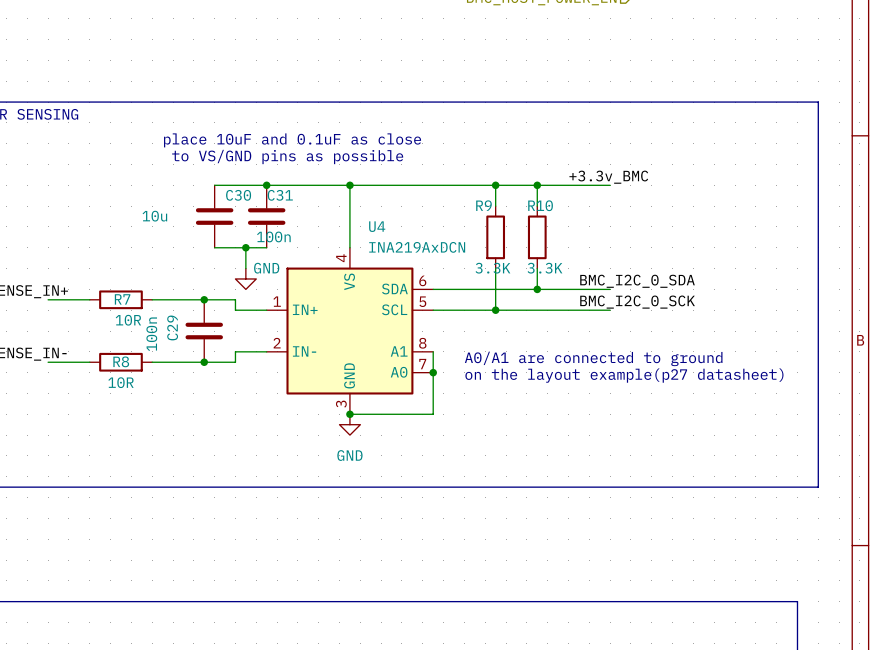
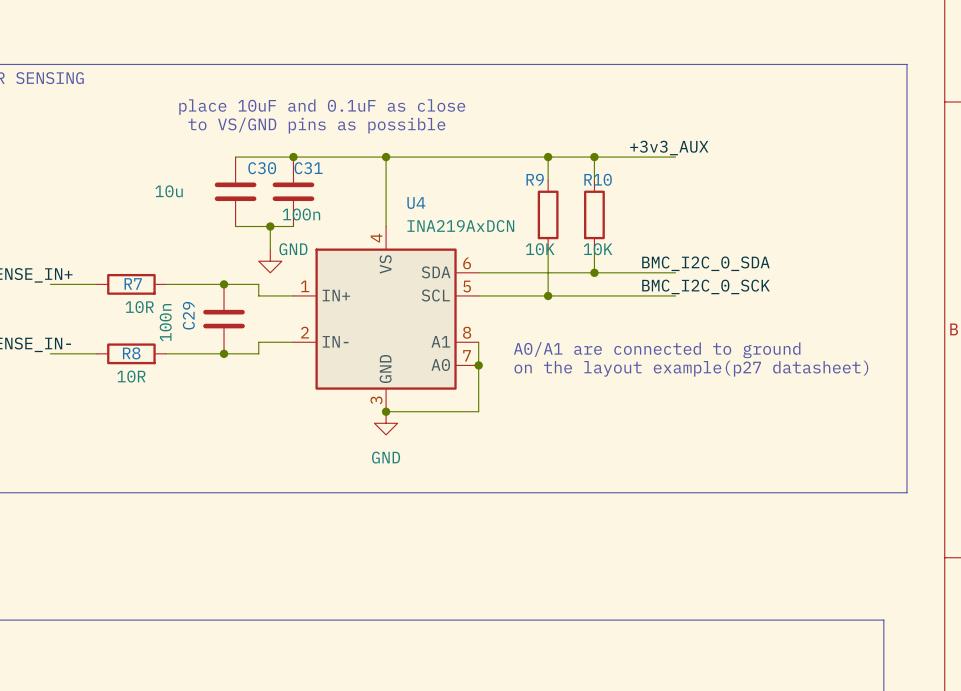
label: +3.3v_BMC (608, 177) -> +3v3_AUX (669, 148)
R9 value: 3.3K (492, 268) -> 10K (540, 249)
R10 value: 3.3K (544, 268) -> 10K (598, 249)

